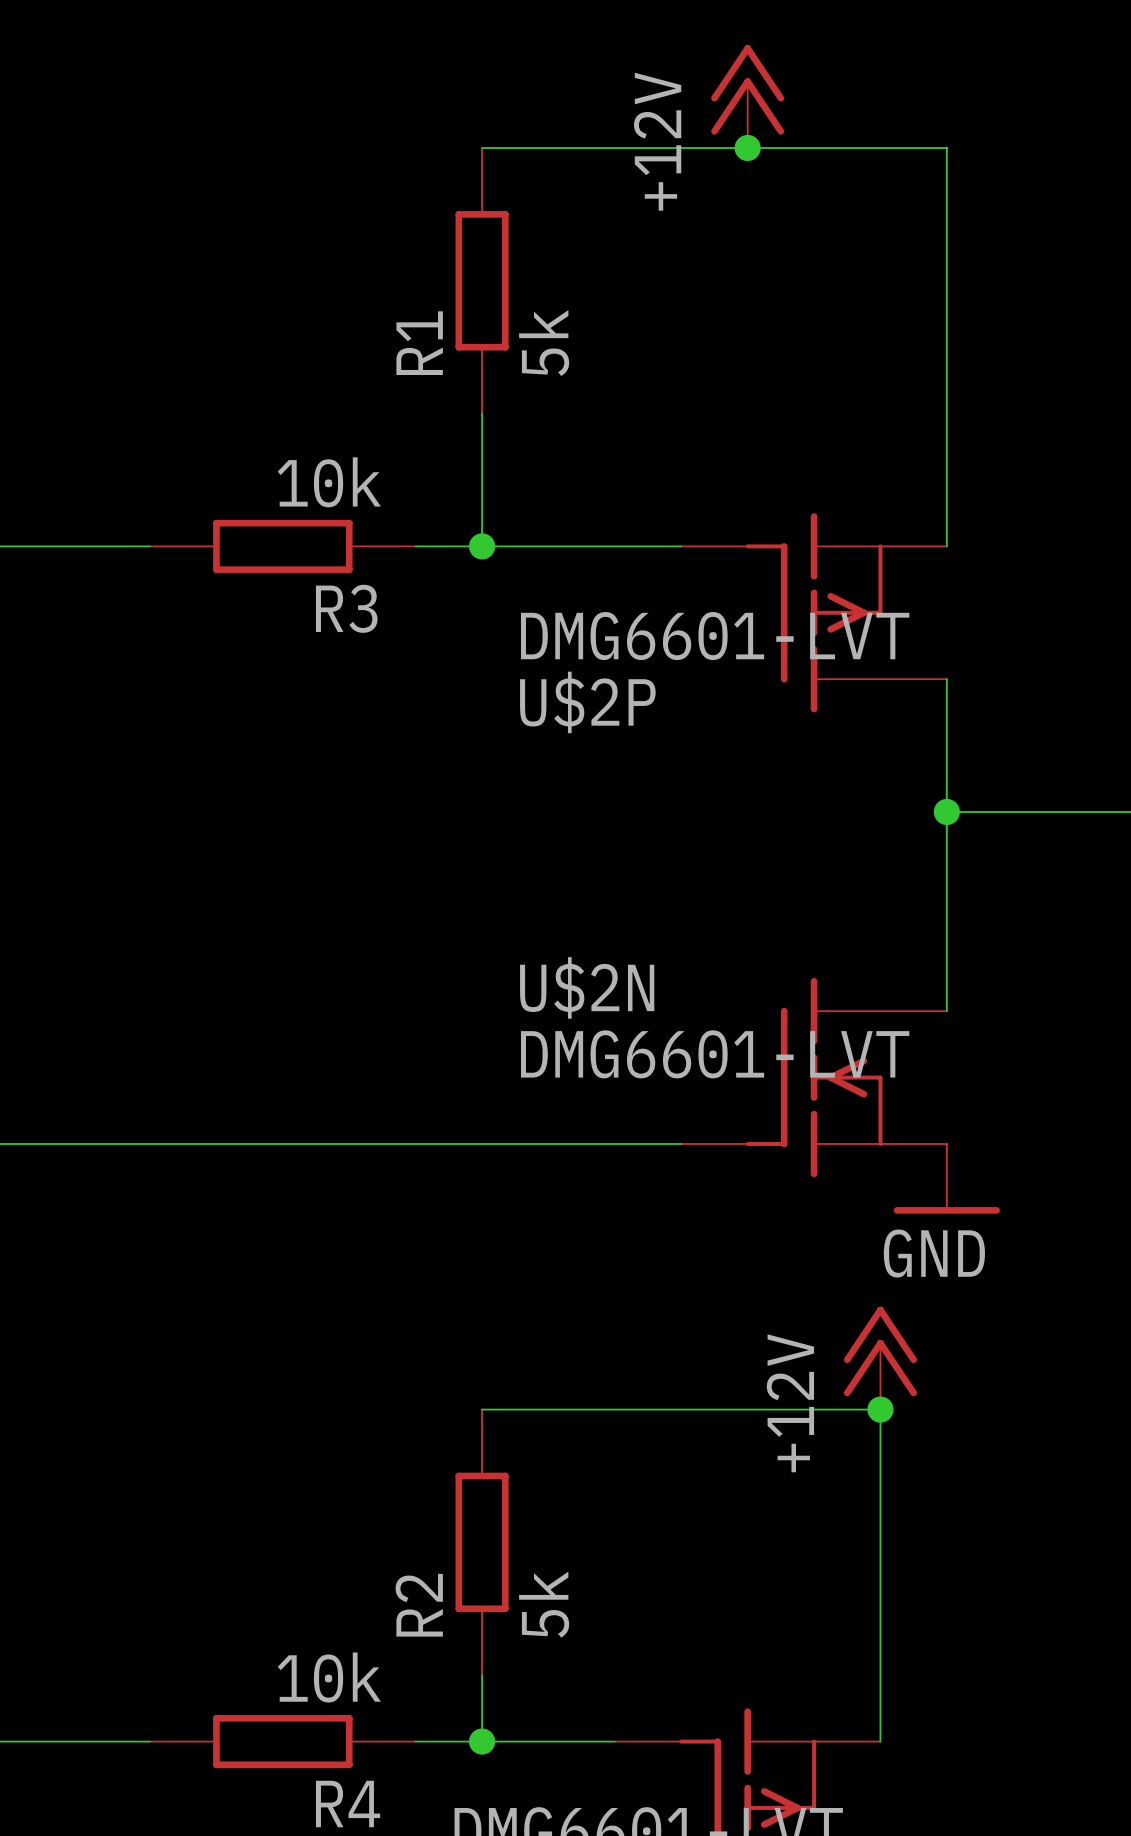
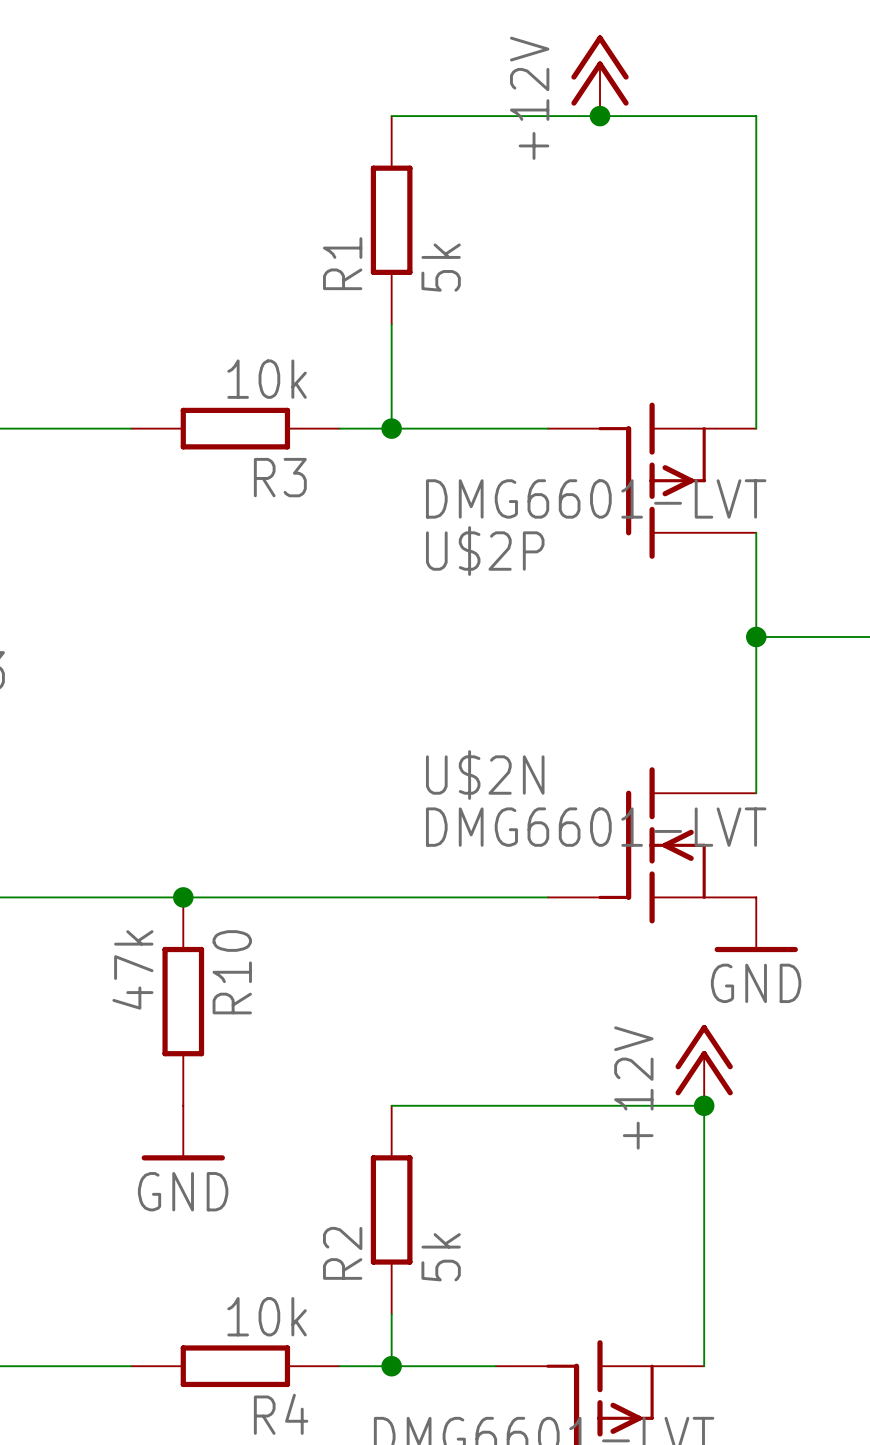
junction: none -> (183, 897)
R10: none -> 47k (183, 1001)
power symbol: none -> GND (183, 1133)

